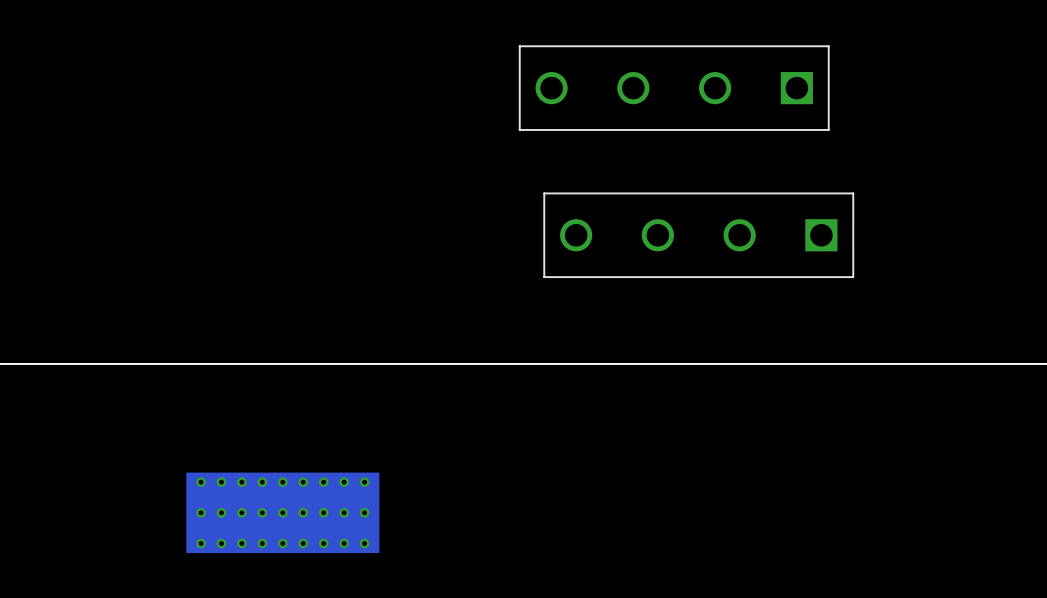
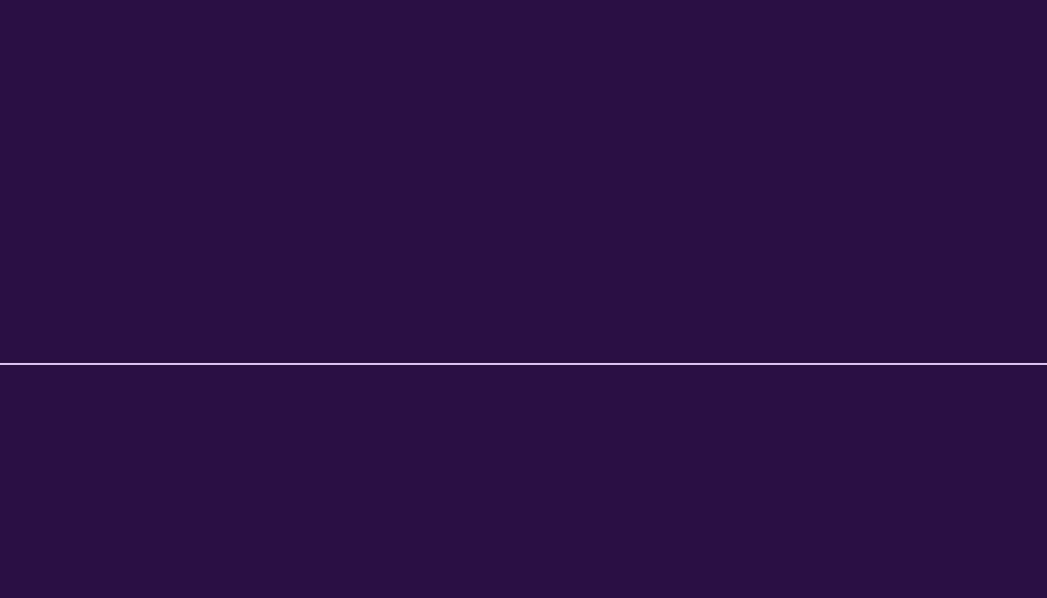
part: (674, 88) -> none
part: (698, 235) -> none
part: (282, 512) -> none

